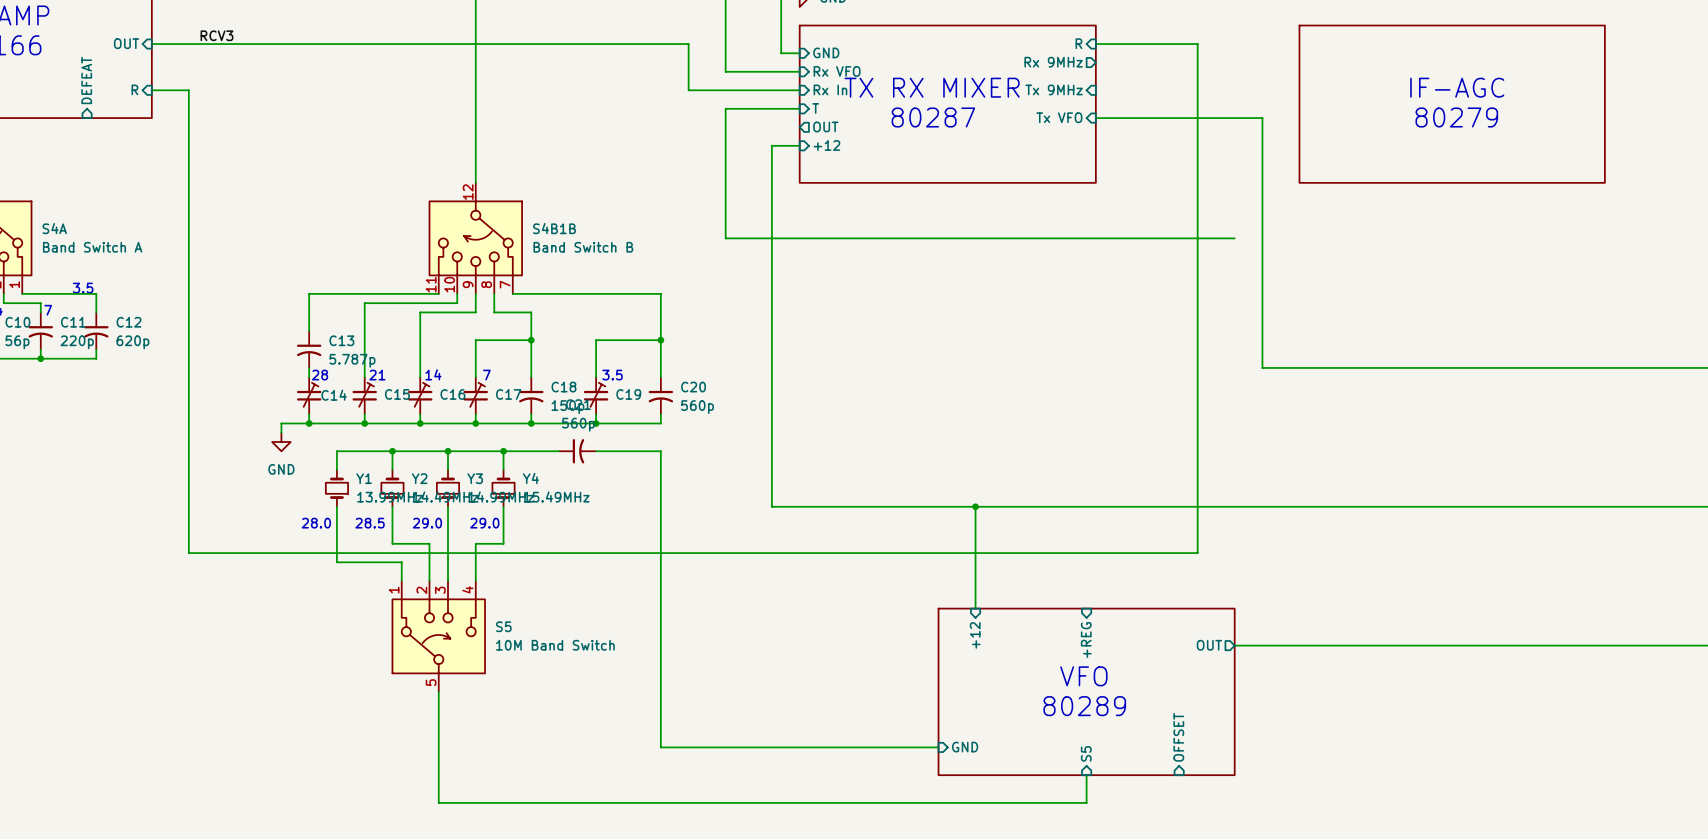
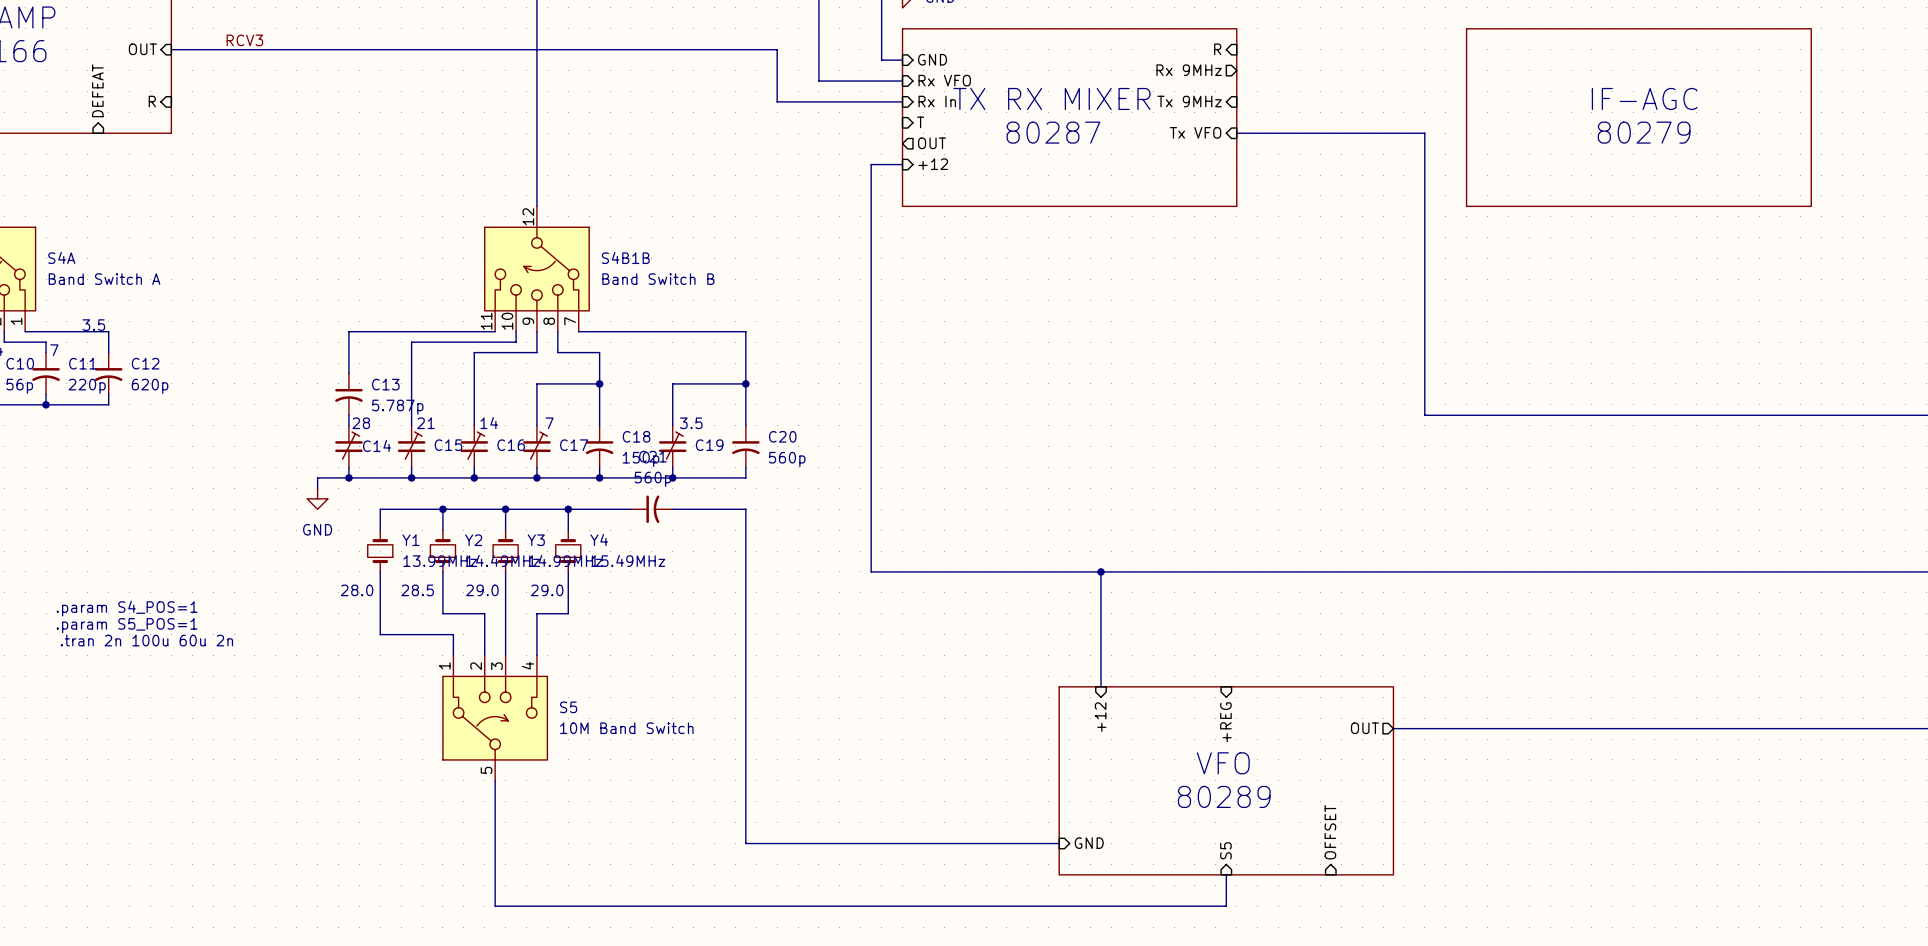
wire: (1095, 44) (1197, 44) (1197, 553) (188, 553) (188, 90) (151, 90) -> none
wire: (799, 108) (725, 108) (725, 238) (1234, 238) -> none
text: none -> .param S4_POS=1 (127, 608)
text: none -> .param S5_POS=1 (127, 625)
text: none -> .tran 2n 100u 60u 2n (146, 640)

